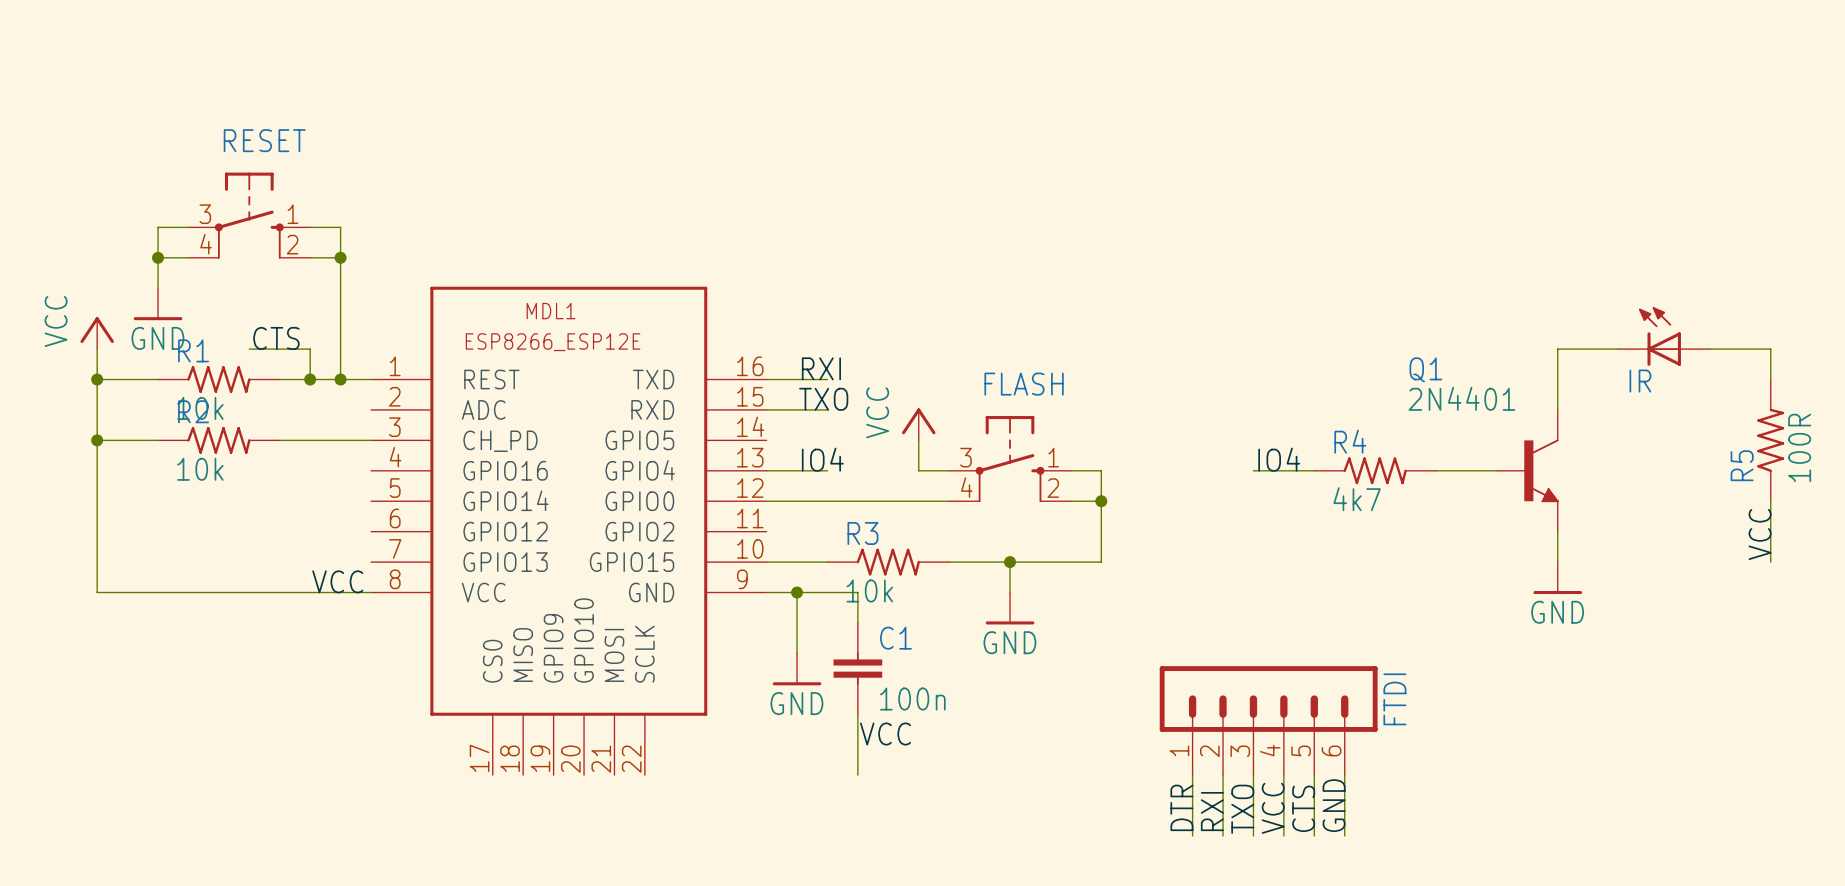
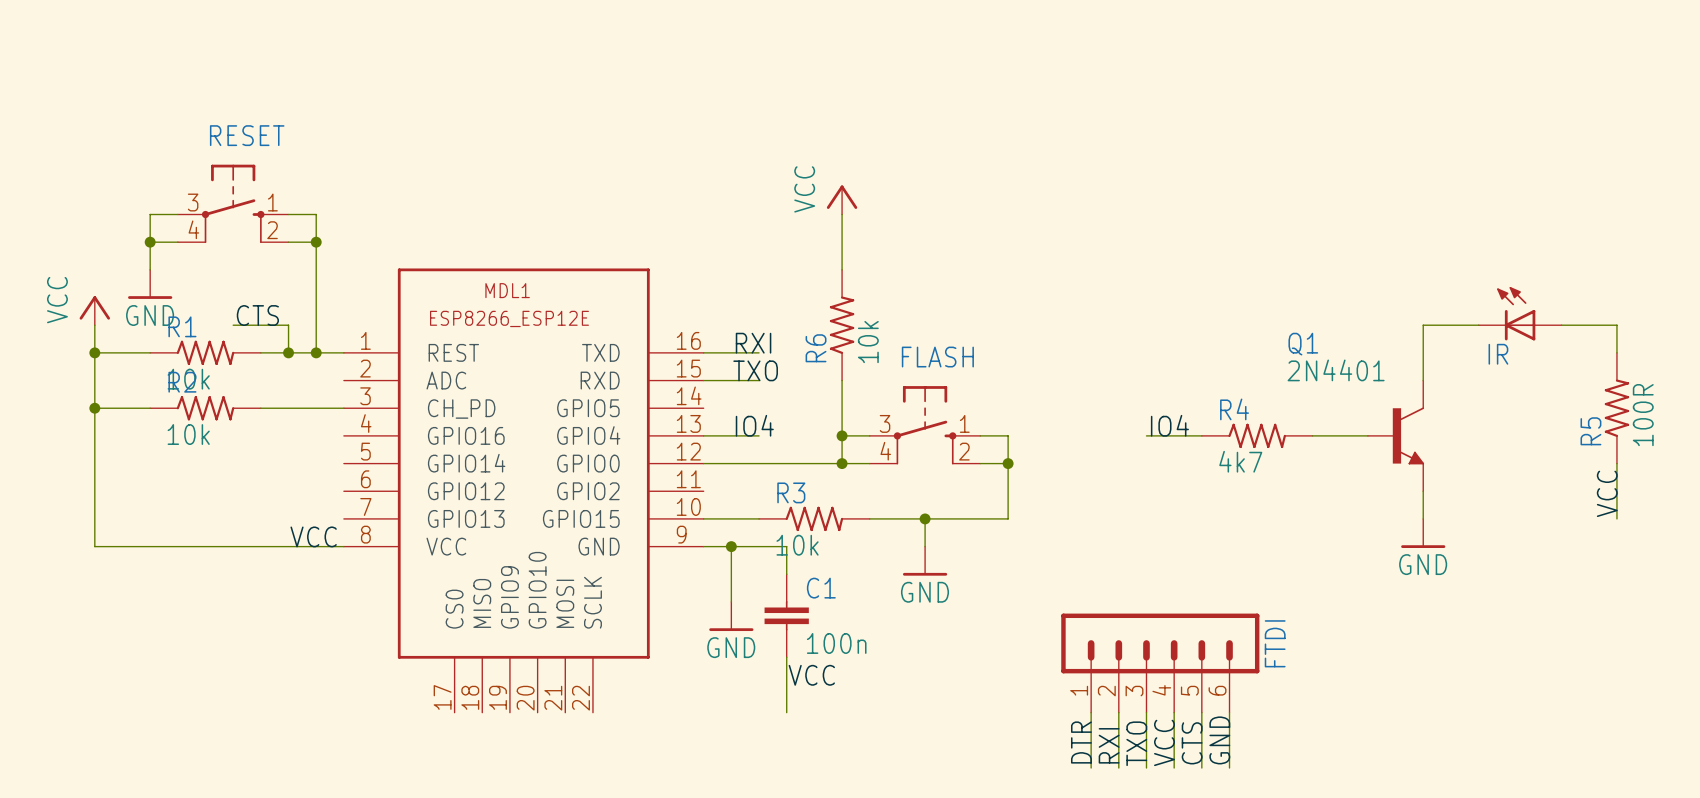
wire: none -> (842, 214) (842, 269)
R6: none -> 10k (842, 325)
power symbol position: VCC (918, 424) -> VCC (842, 199)
wire: none -> (842, 435) (842, 463)
junction: none -> (842, 435)
junction: none -> (842, 463)

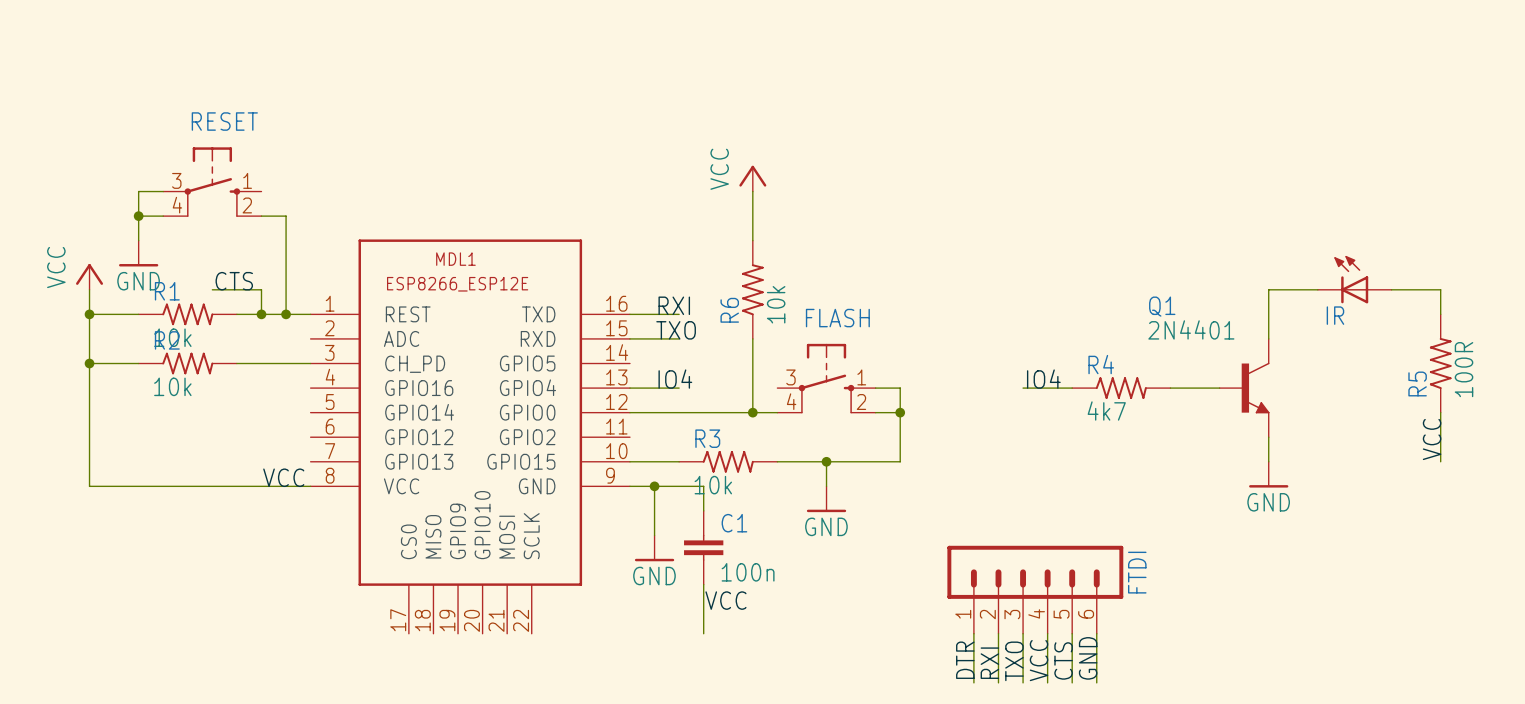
wire: (288, 214) (316, 214) (316, 242) -> none
junction: (316, 242) -> none
wire: (842, 435) (869, 435) -> none
junction: (842, 435) -> none

